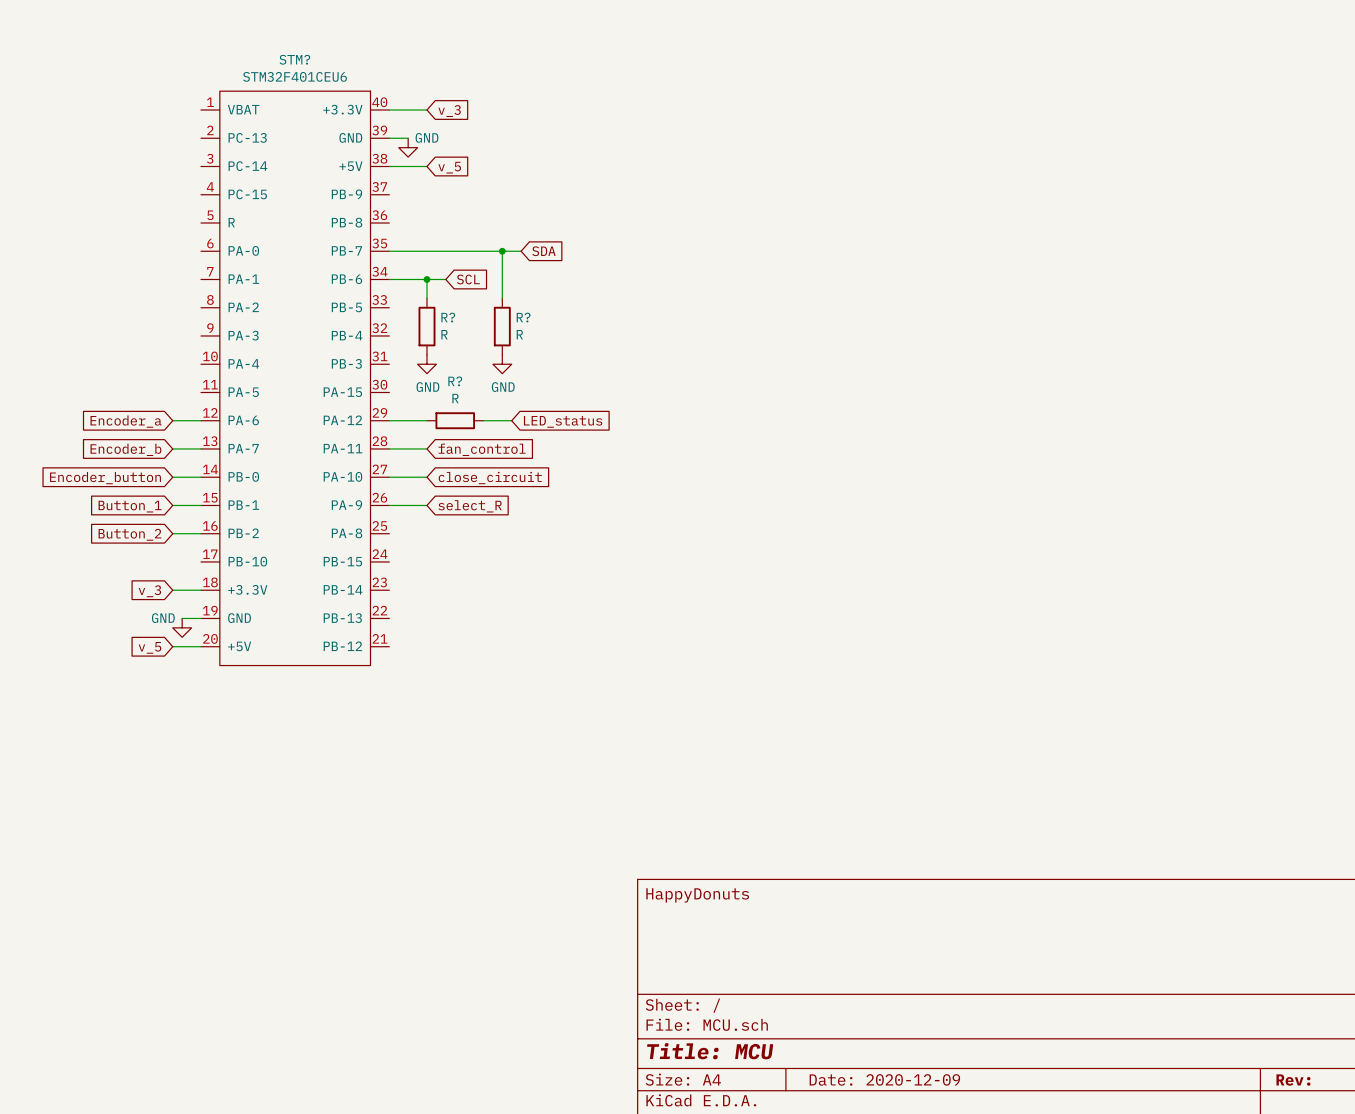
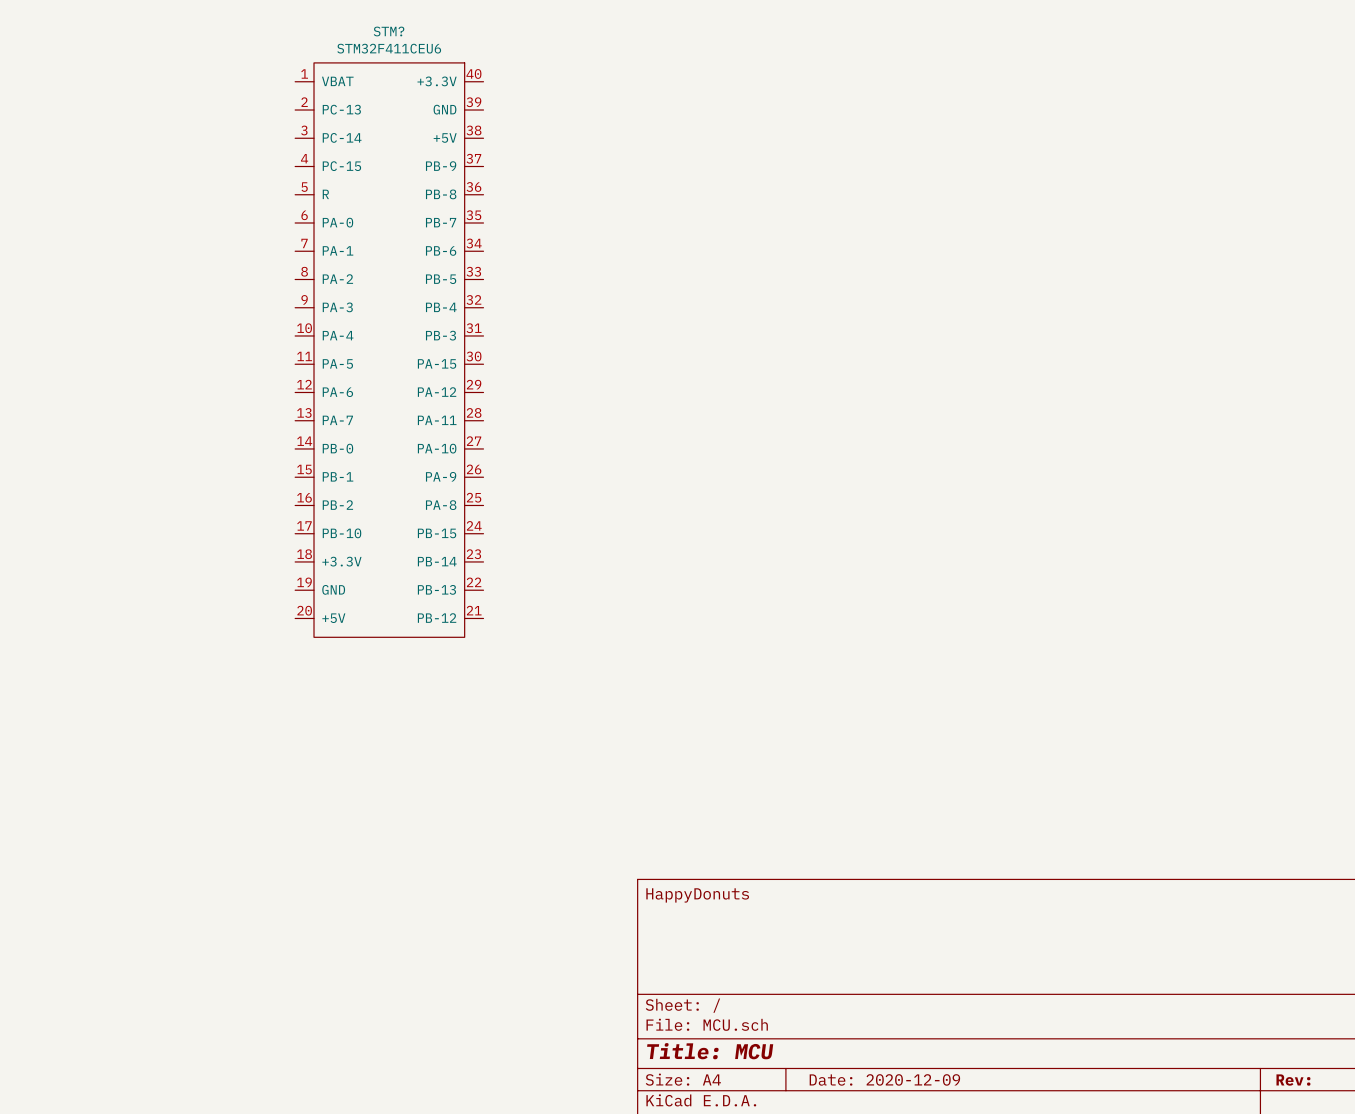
wire: (389, 110) (426, 110) -> none
global label: v_3 (449, 111) -> none
wire: (389, 138) (408, 138) -> none
power symbol: GND (408, 147) -> none
wire: (389, 166) (426, 166) -> none
global label: v_5 (449, 167) -> none
wire: (389, 251) (521, 251) -> none
wire: (502, 251) (502, 298) -> none
junction: (502, 251) -> none
global label: SDA (543, 251) -> none
wire: (389, 279) (445, 279) -> none
wire: (426, 279) (426, 298) -> none
junction: (426, 279) -> none
global label: SCL (468, 279) -> none
R?: R (426, 326) -> none
R?: R (502, 326) -> none
STM?: none -> STM32F411CEU6 (389, 350)
power symbol: GND (426, 364) -> none
power symbol: GND (502, 364) -> none
STM?: STM32F401CEU6 (295, 378) -> none
wire: (172, 420) (201, 420) -> none
wire: (389, 420) (426, 420) -> none
R?: R (455, 420) -> none
wire: (483, 420) (511, 420) -> none
global label: Encoder_a (126, 421) -> none
global label: LED_status (563, 421) -> none
wire: (172, 448) (201, 448) -> none
wire: (389, 448) (426, 448) -> none
global label: Encoder_b (125, 449) -> none
global label: fan_control (482, 449) -> none
wire: (172, 477) (201, 477) -> none
wire: (389, 477) (426, 477) -> none
global label: Encoder_button (105, 478) -> none
global label: close_circuit (490, 478) -> none
wire: (172, 505) (201, 505) -> none
wire: (389, 505) (426, 505) -> none
global label: Button_1 (130, 506) -> none
global label: select_R (470, 506) -> none
wire: (172, 533) (201, 533) -> none
global label: Button_2 (129, 534) -> none
wire: (172, 590) (201, 590) -> none
global label: v_3 (149, 591) -> none
wire: (182, 618) (201, 618) -> none
power symbol: GND (182, 627) -> none
wire: (172, 646) (201, 646) -> none
global label: v_5 (150, 647) -> none

